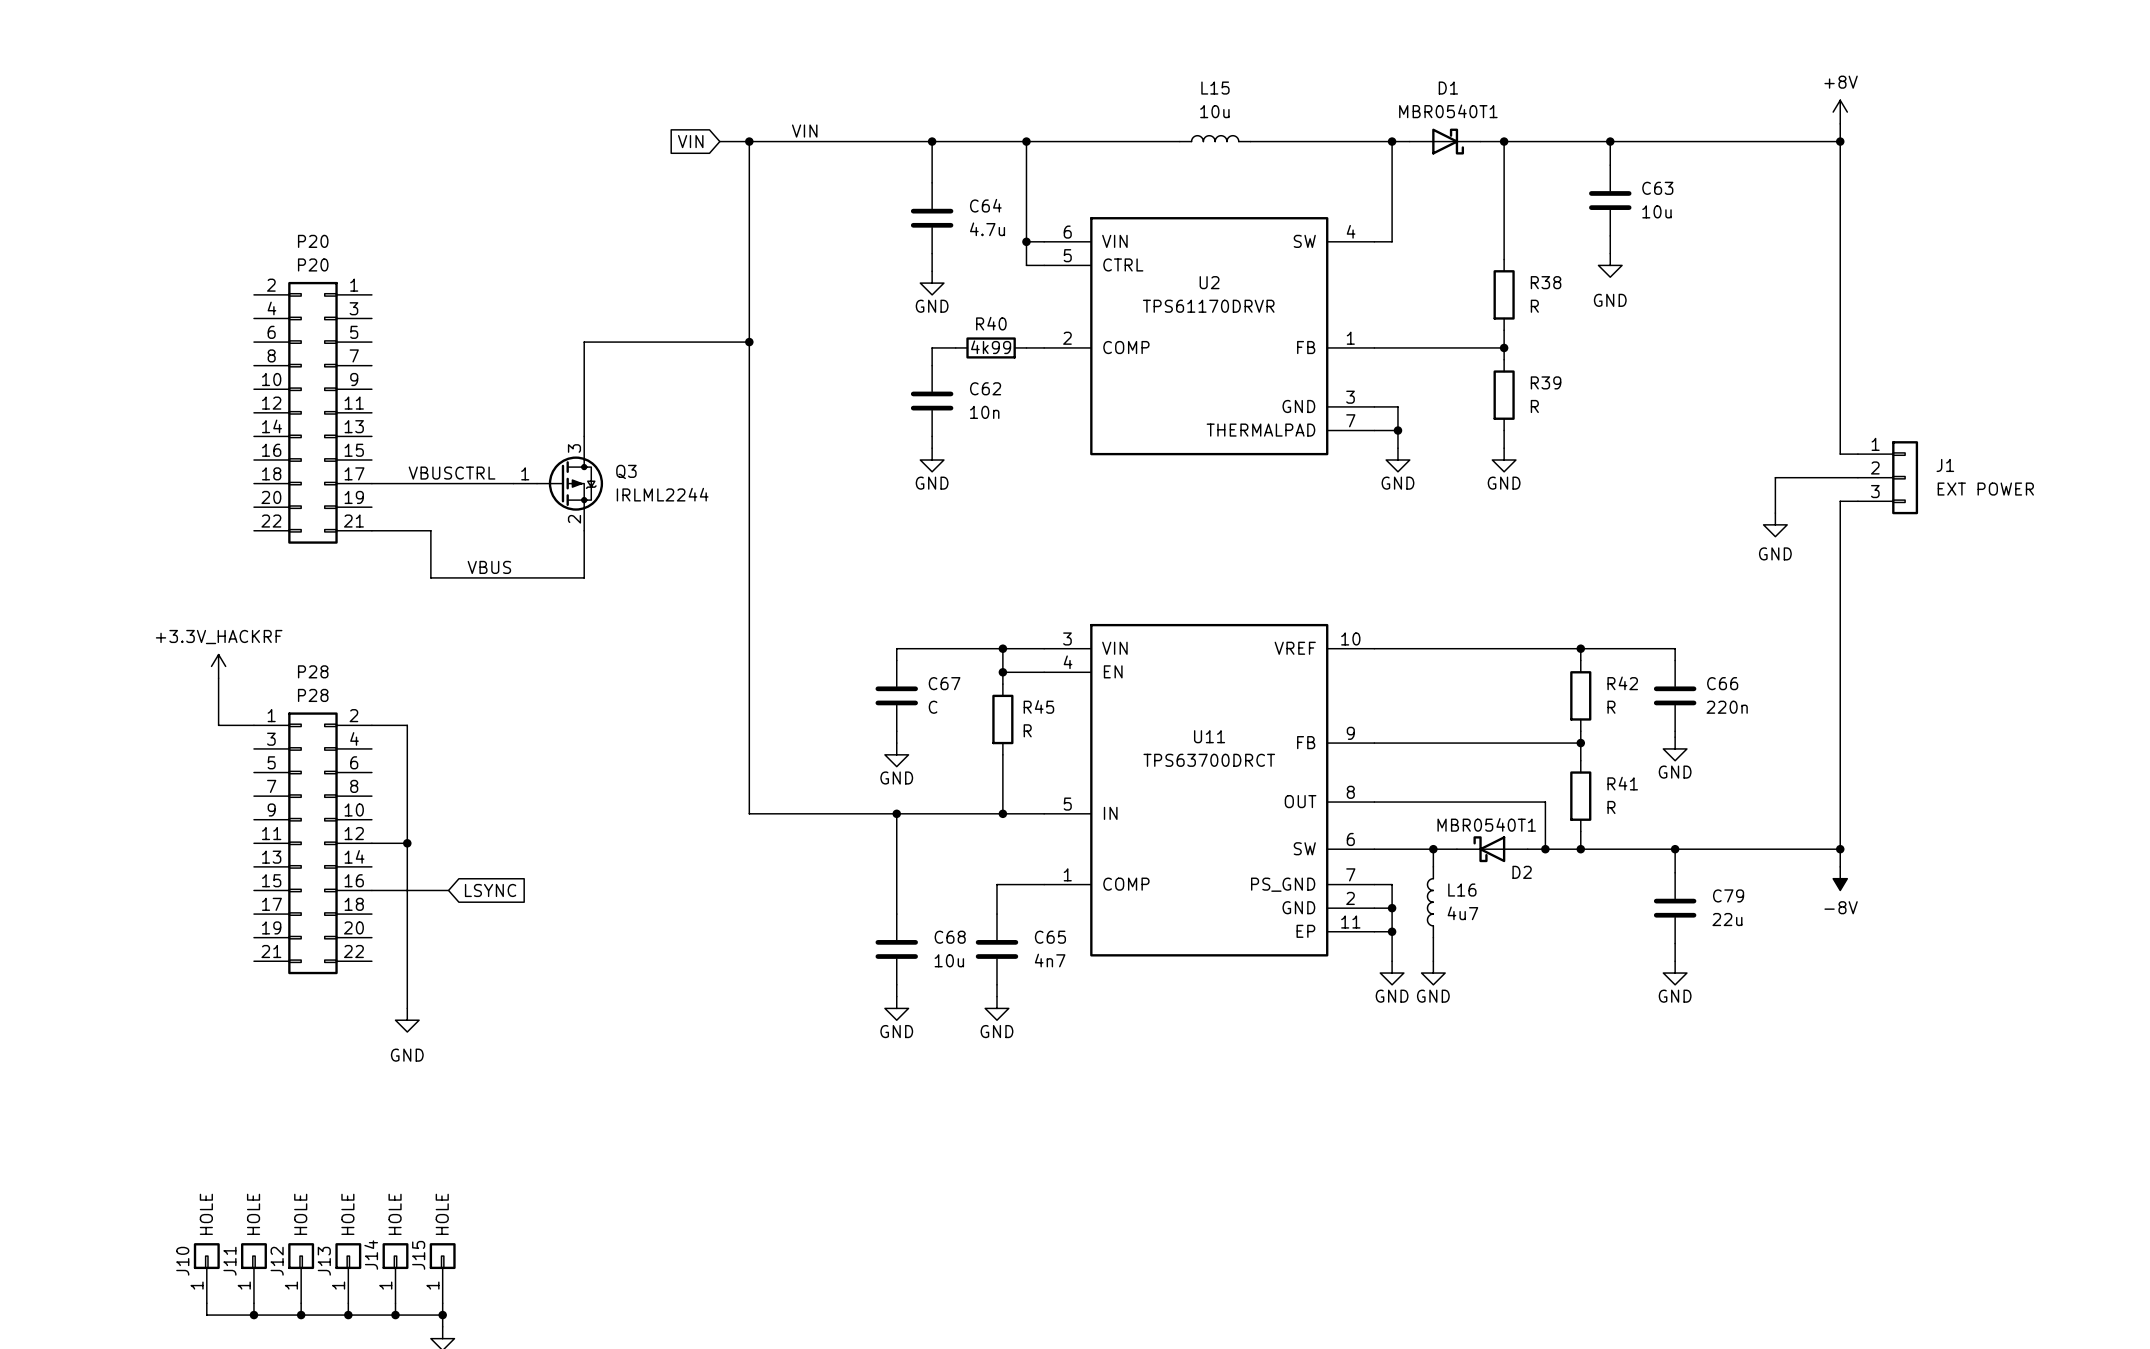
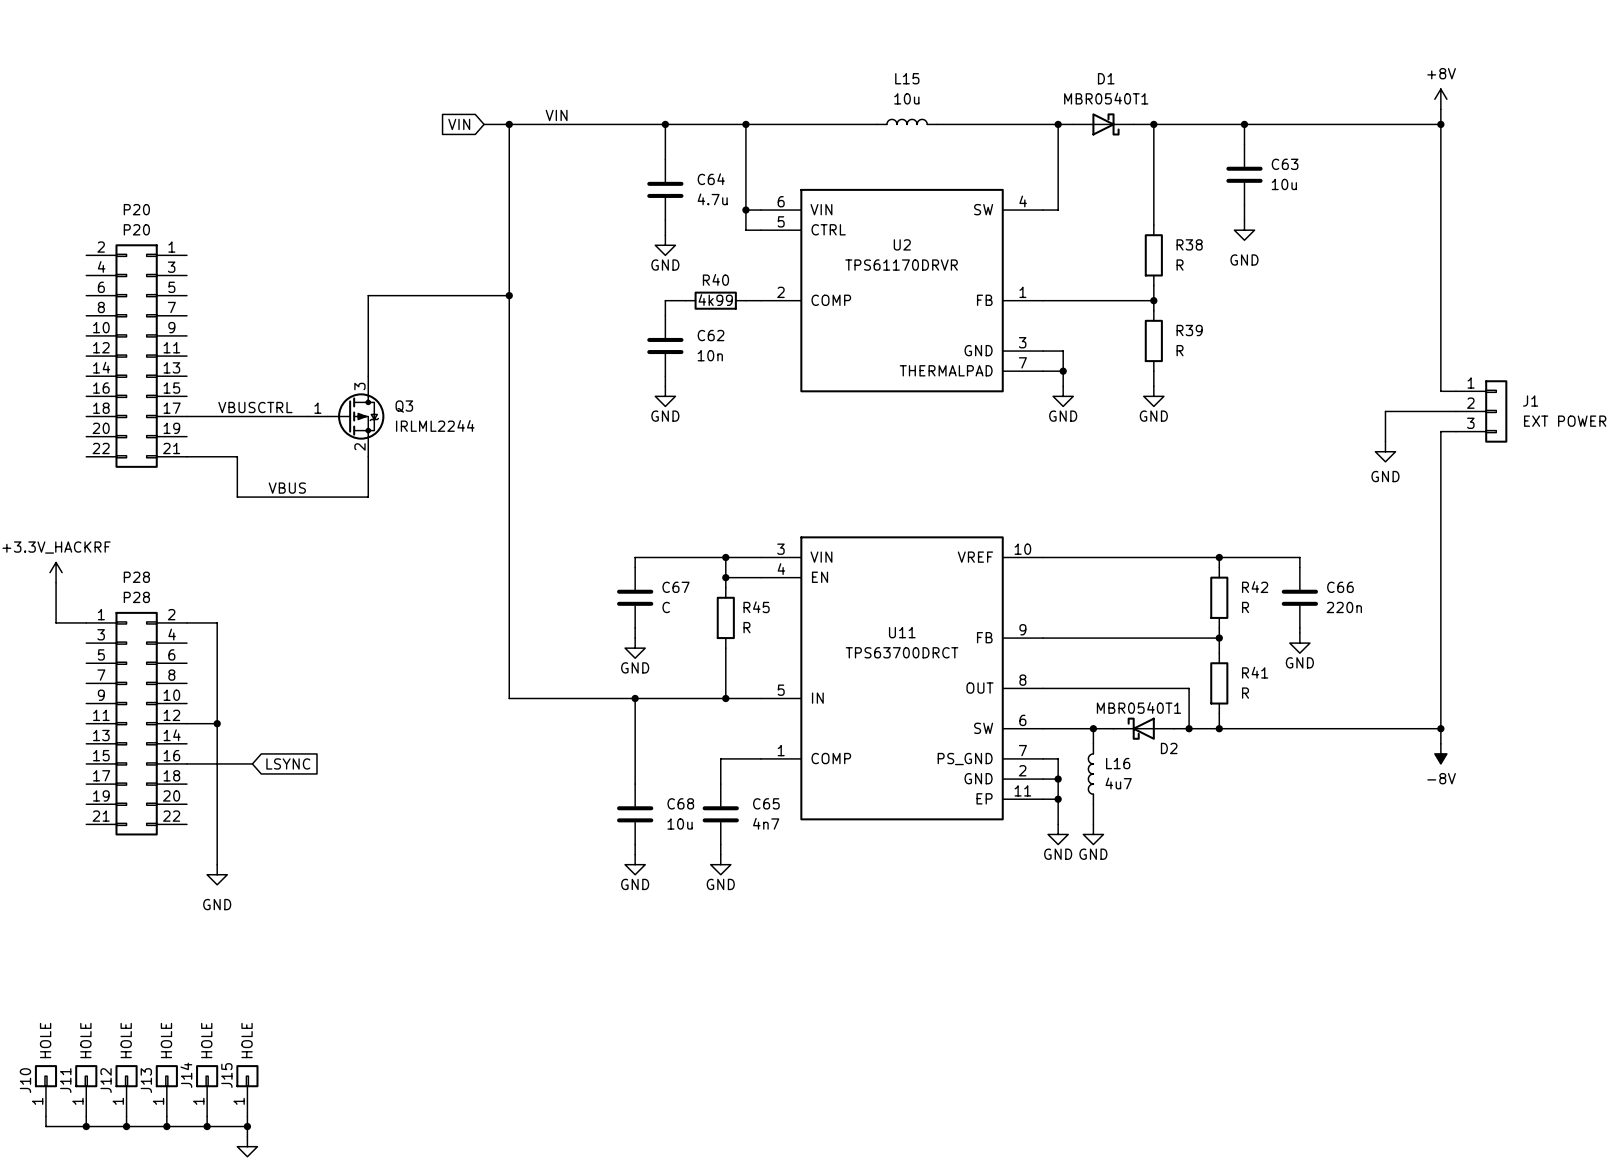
wire: (1675, 849) (1675, 872) -> none
junction: (1675, 849) -> none
C79: 22u (1675, 908) -> none
wire: (1675, 943) (1675, 961) -> none
power symbol: GND (1675, 973) -> none

